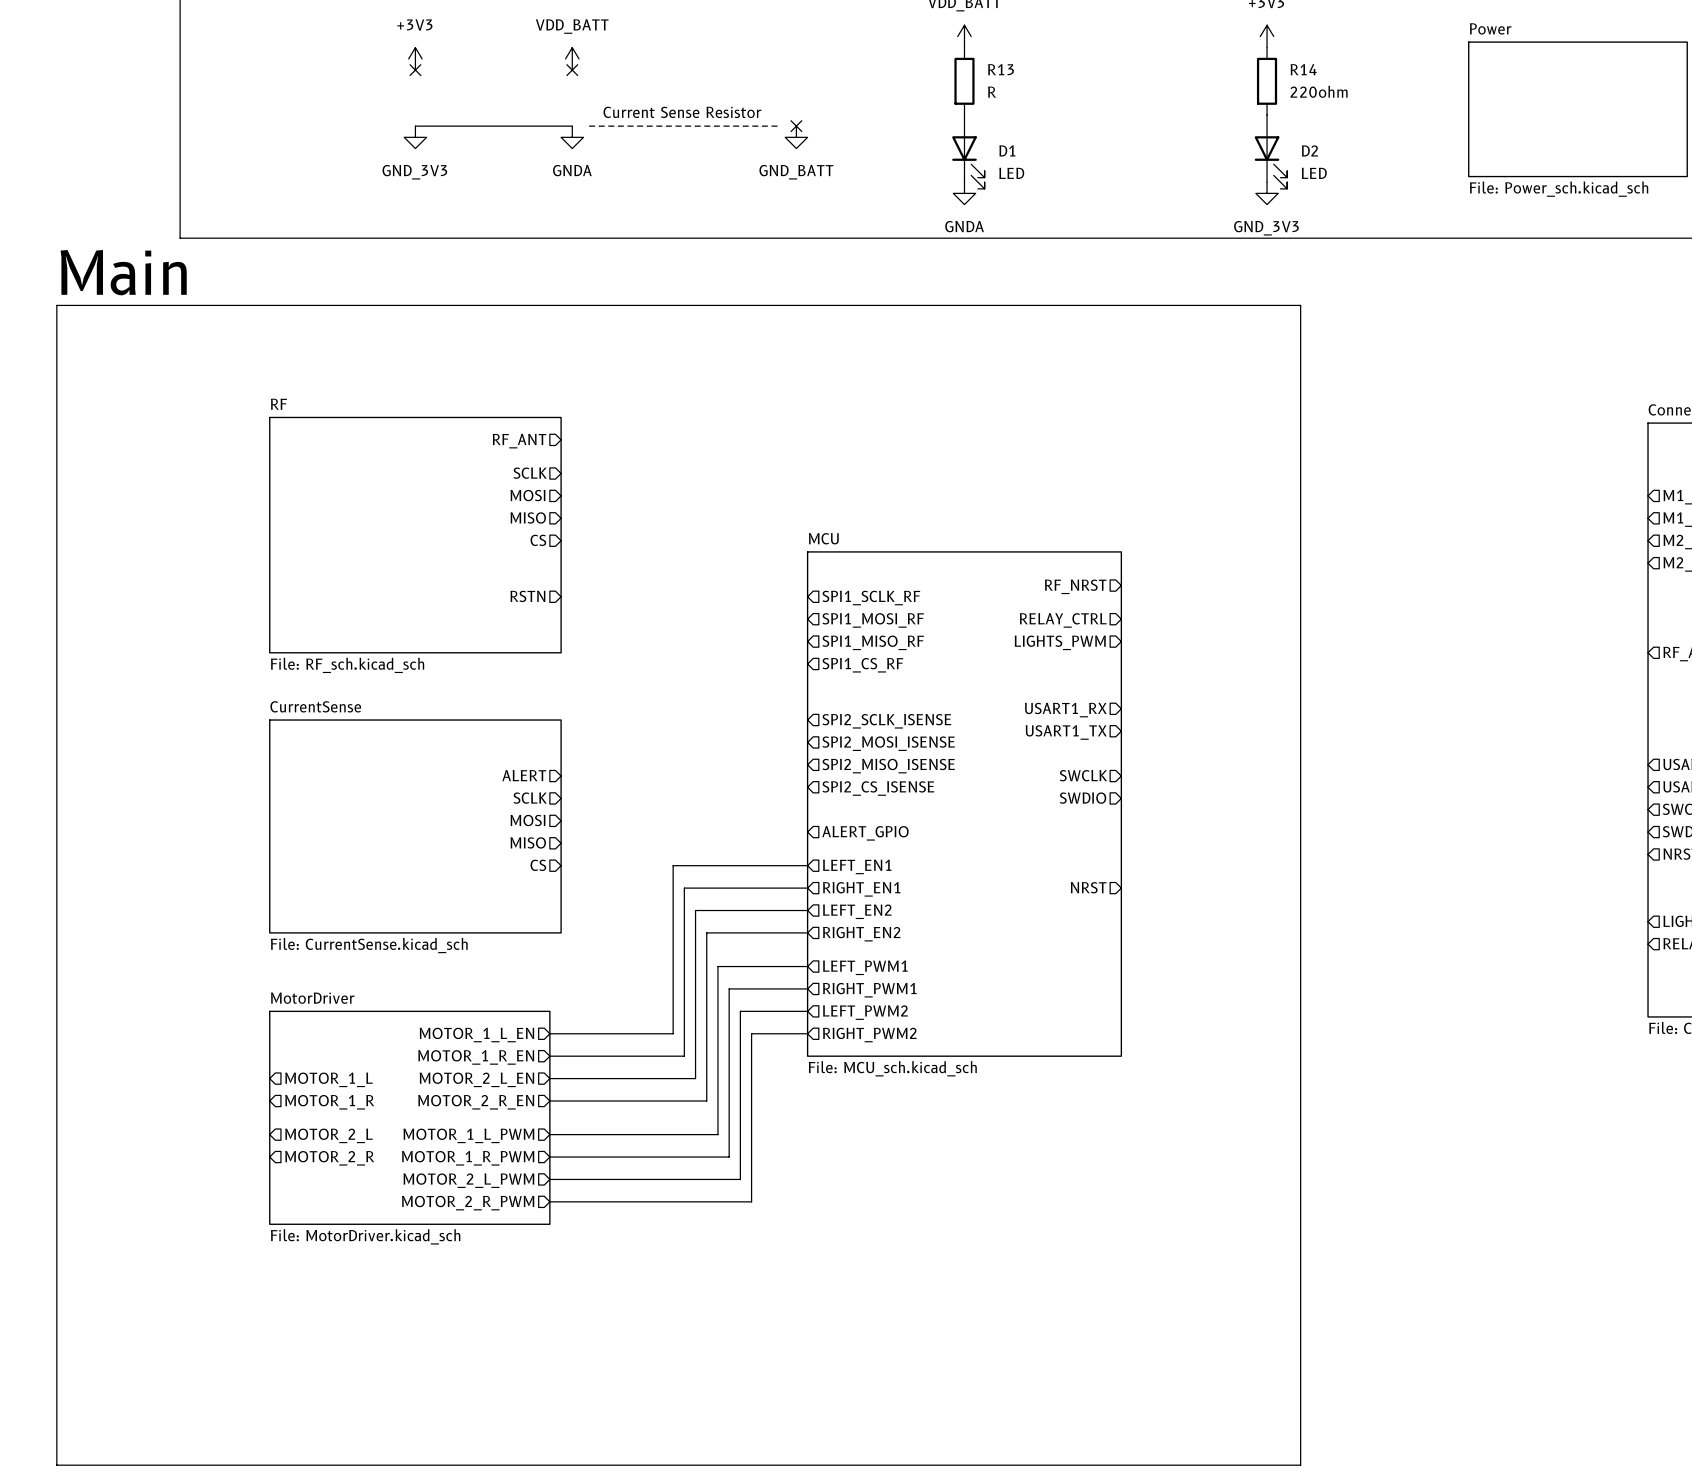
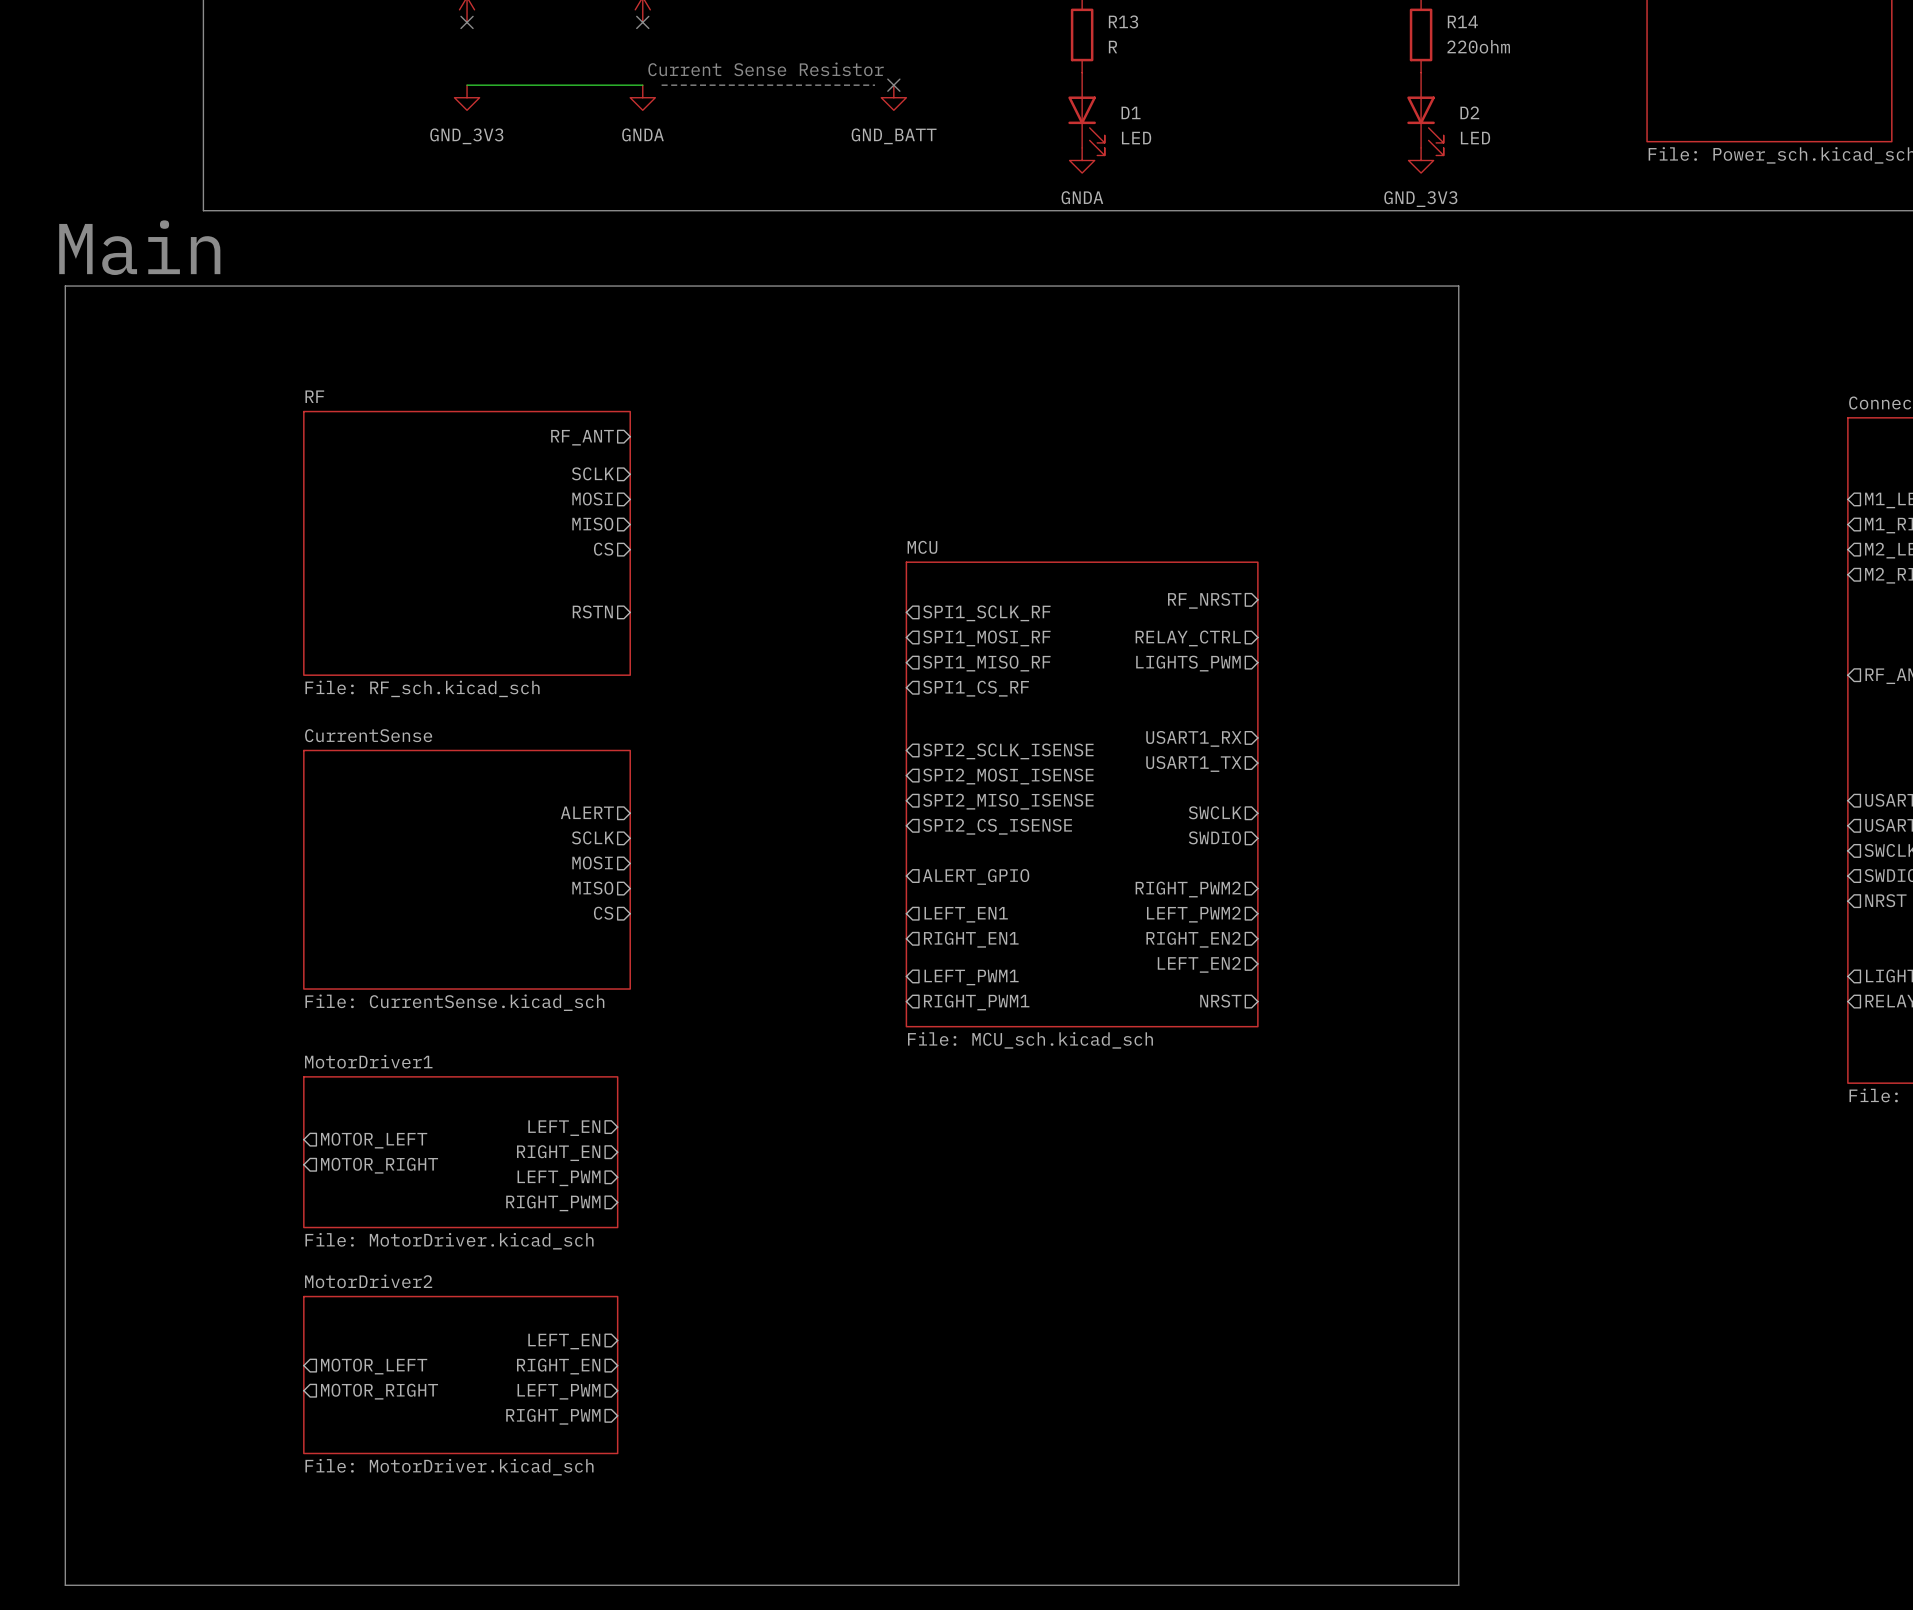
sheet MCU: none -> File: MCU_sch.kicad_sch (1082, 794)
sheet MCU: File: MCU_sch.kicad_sch (964, 804) -> none
hierarchical label: none -> RIGHT_PWM2 (1188, 889)
wire: (807, 865) (673, 865) (673, 1033) (549, 1033) -> none
hierarchical label: none -> LEFT_PWM2 (1193, 914)
hierarchical label: NRST (1088, 887) -> RIGHT_EN2 (1193, 939)
wire: (807, 888) (684, 888) (684, 1056) (549, 1056) -> none
wire: (807, 910) (695, 910) (695, 1078) (549, 1078) -> none
hierarchical label: LEFT_EN2 (857, 911) -> none
hierarchical label: none -> LEFT_EN2 (1199, 964)
wire: (807, 932) (706, 932) (706, 1101) (549, 1101) -> none
hierarchical label: RIGHT_EN2 (861, 934) -> none
hierarchical label: none -> NRST (1220, 1001)
wire: (807, 966) (717, 966) (717, 1134) (549, 1134) -> none
hierarchical label position: LEFT_PWM1 (865, 967) -> LEFT_PWM1 (971, 977)
wire: (807, 988) (729, 988) (729, 1157) (549, 1157) -> none
hierarchical label position: RIGHT_PWM1 (869, 990) -> RIGHT_PWM1 (976, 1002)
wire: (807, 1011) (740, 1011) (740, 1179) (549, 1179) -> none
hierarchical label: LEFT_PWM2 (865, 1012) -> none
wire: (807, 1033) (751, 1033) (751, 1201) (549, 1201) -> none
hierarchical label: MOTOR_1_L_EN (476, 1035) -> none
hierarchical label: RIGHT_PWM2 (869, 1035) -> none
hierarchical label: MOTOR_1_R_EN (476, 1057) -> LEFT_EN (564, 1128)
sheet MotorDriver1: none -> File: MotorDriver.kicad_sch (460, 1152)
hierarchical label: MOTOR_1_L (328, 1079) -> MOTOR_LEFT (374, 1140)
hierarchical label: MOTOR_2_L_EN (476, 1079) -> RIGHT_EN (558, 1153)
hierarchical label: MOTOR_1_R (329, 1102) -> MOTOR_RIGHT (379, 1165)
hierarchical label: MOTOR_2_R_EN (476, 1102) -> LEFT_PWM (559, 1178)
sheet MotorDriver: File: MotorDriver.kicad_sch (409, 1117) -> none
hierarchical label: none -> RIGHT_PWM (553, 1203)
hierarchical label: MOTOR_2_L (328, 1135) -> none
hierarchical label: MOTOR_1_L_PWM (468, 1135) -> none
hierarchical label: MOTOR_2_R (329, 1158) -> none
hierarchical label: MOTOR_1_R_PWM (468, 1158) -> none
hierarchical label: MOTOR_2_L_PWM (468, 1180) -> none
hierarchical label: MOTOR_2_R_PWM (468, 1203) -> none
hierarchical label: none -> LEFT_EN (564, 1341)
hierarchical label: none -> MOTOR_LEFT (374, 1366)
hierarchical label: none -> RIGHT_EN (558, 1366)
sheet MotorDriver2: none -> File: MotorDriver.kicad_sch (460, 1375)
hierarchical label: none -> MOTOR_RIGHT (379, 1391)
hierarchical label: none -> LEFT_PWM (559, 1391)
hierarchical label: none -> RIGHT_PWM (553, 1416)

